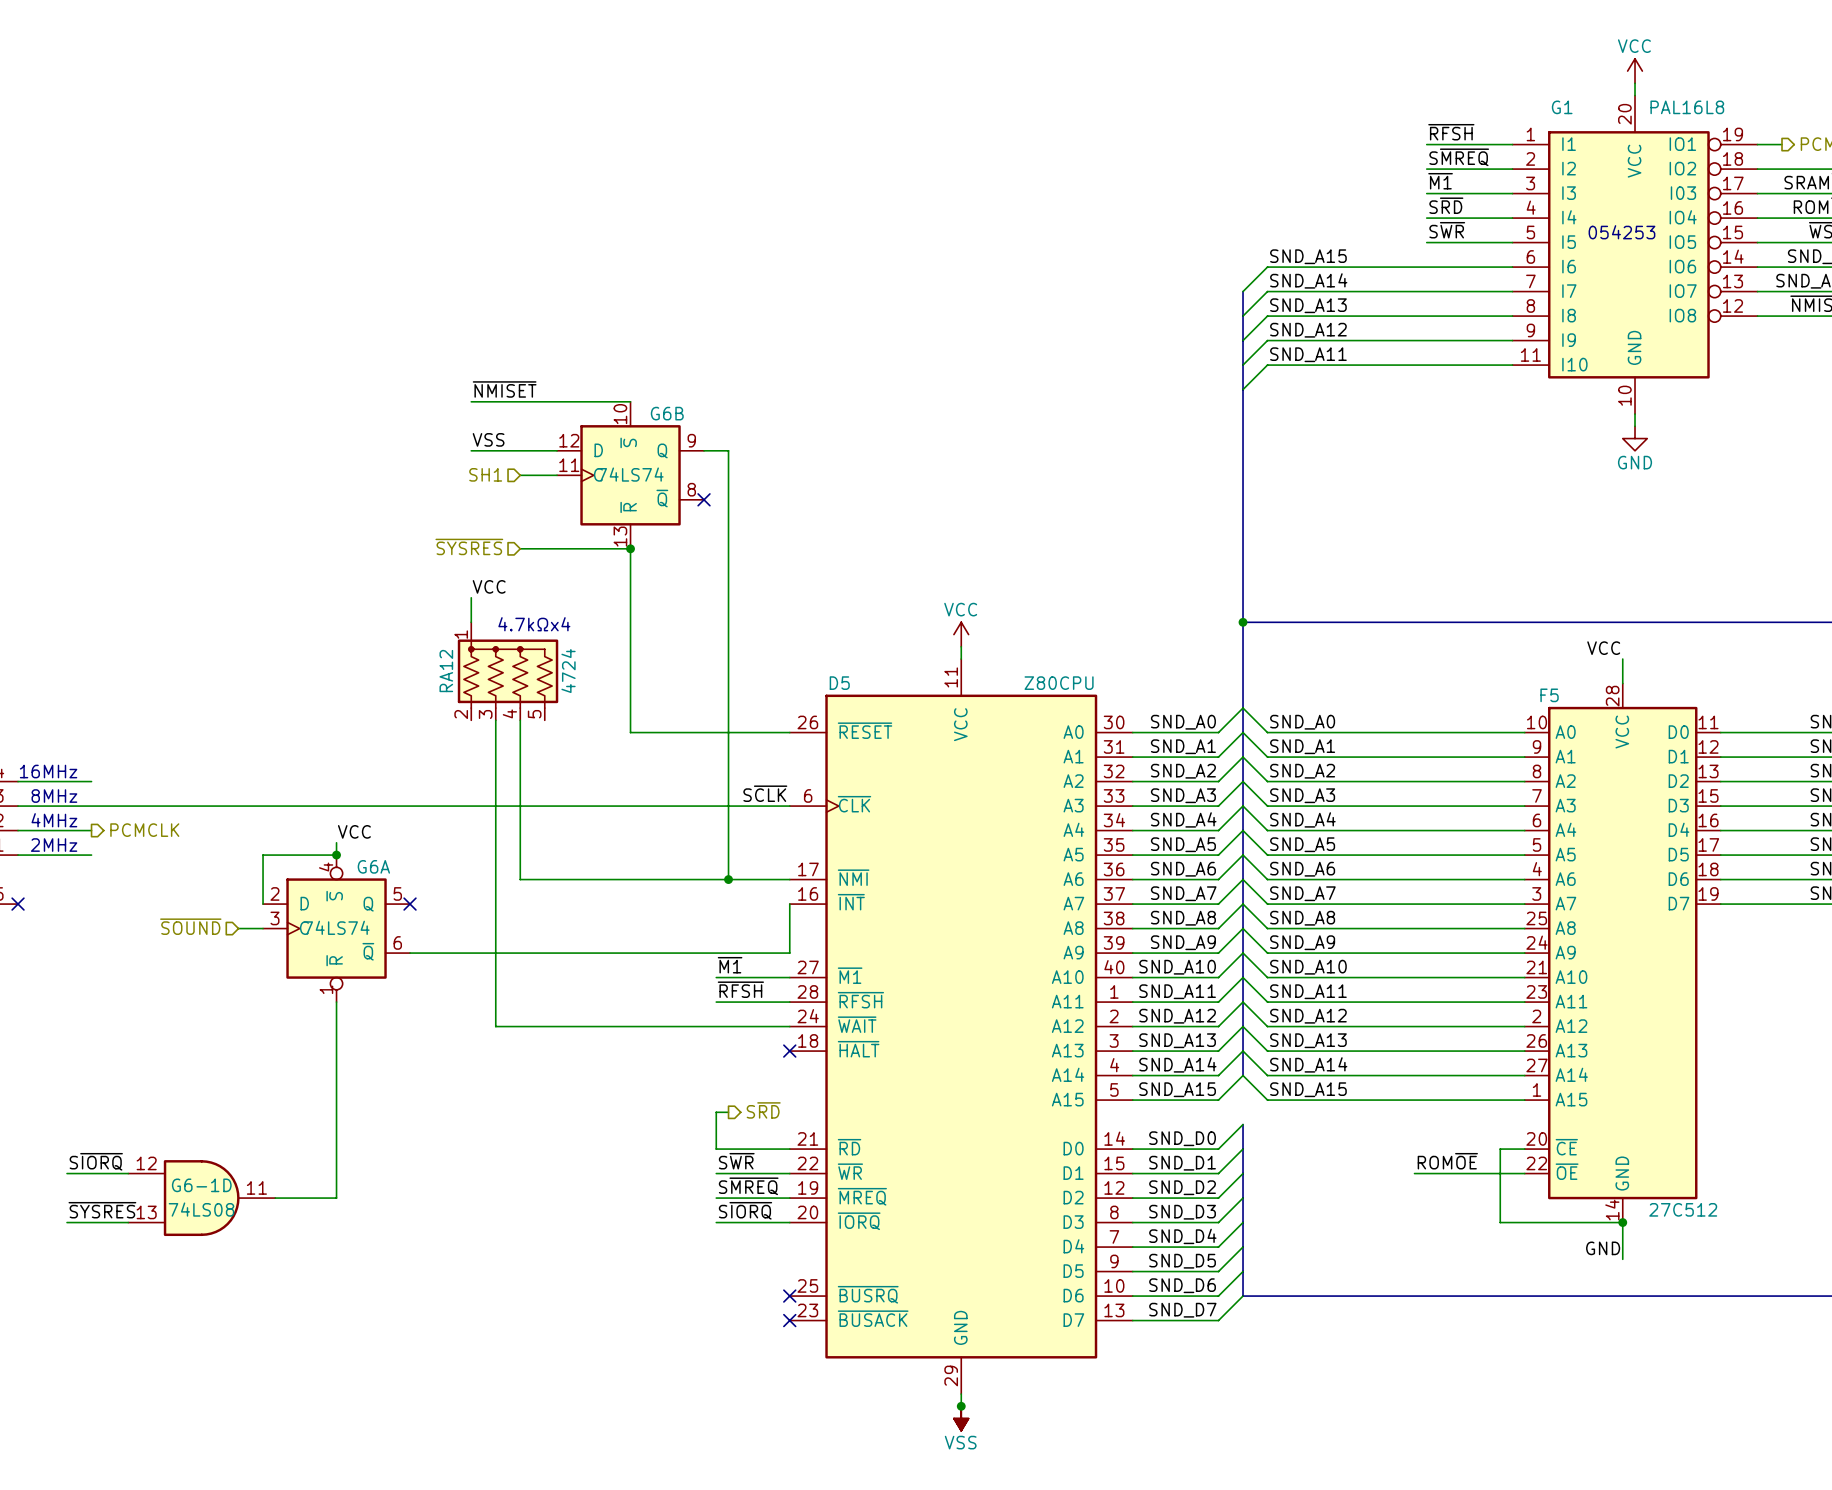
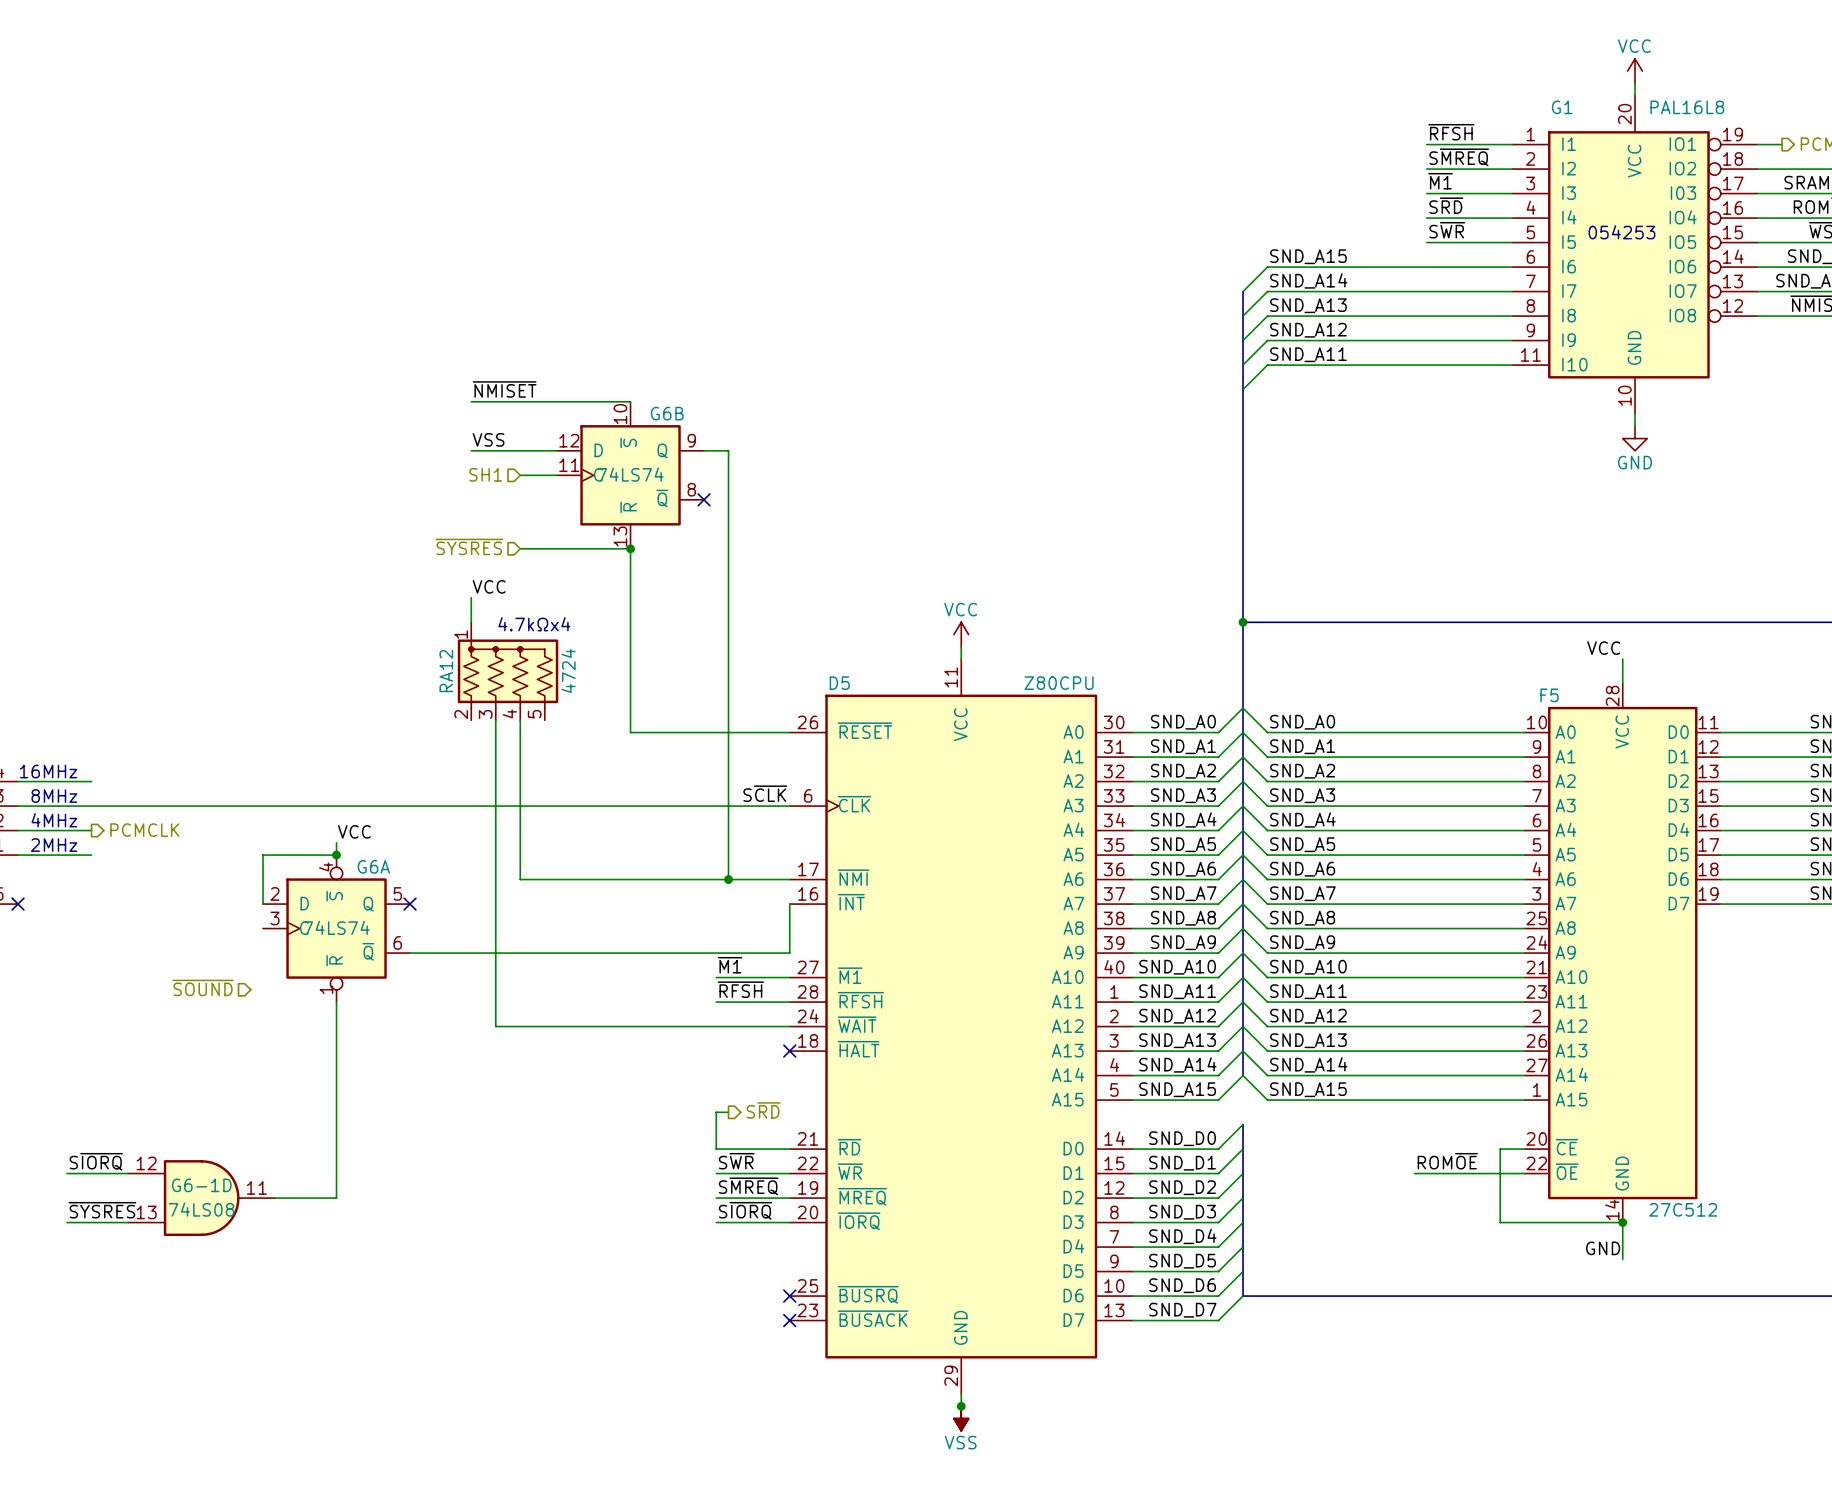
hierarchical label position: ~{SOUND} (190, 926) -> ~{SOUND} (203, 987)
wire: (238, 928) (263, 928) -> none

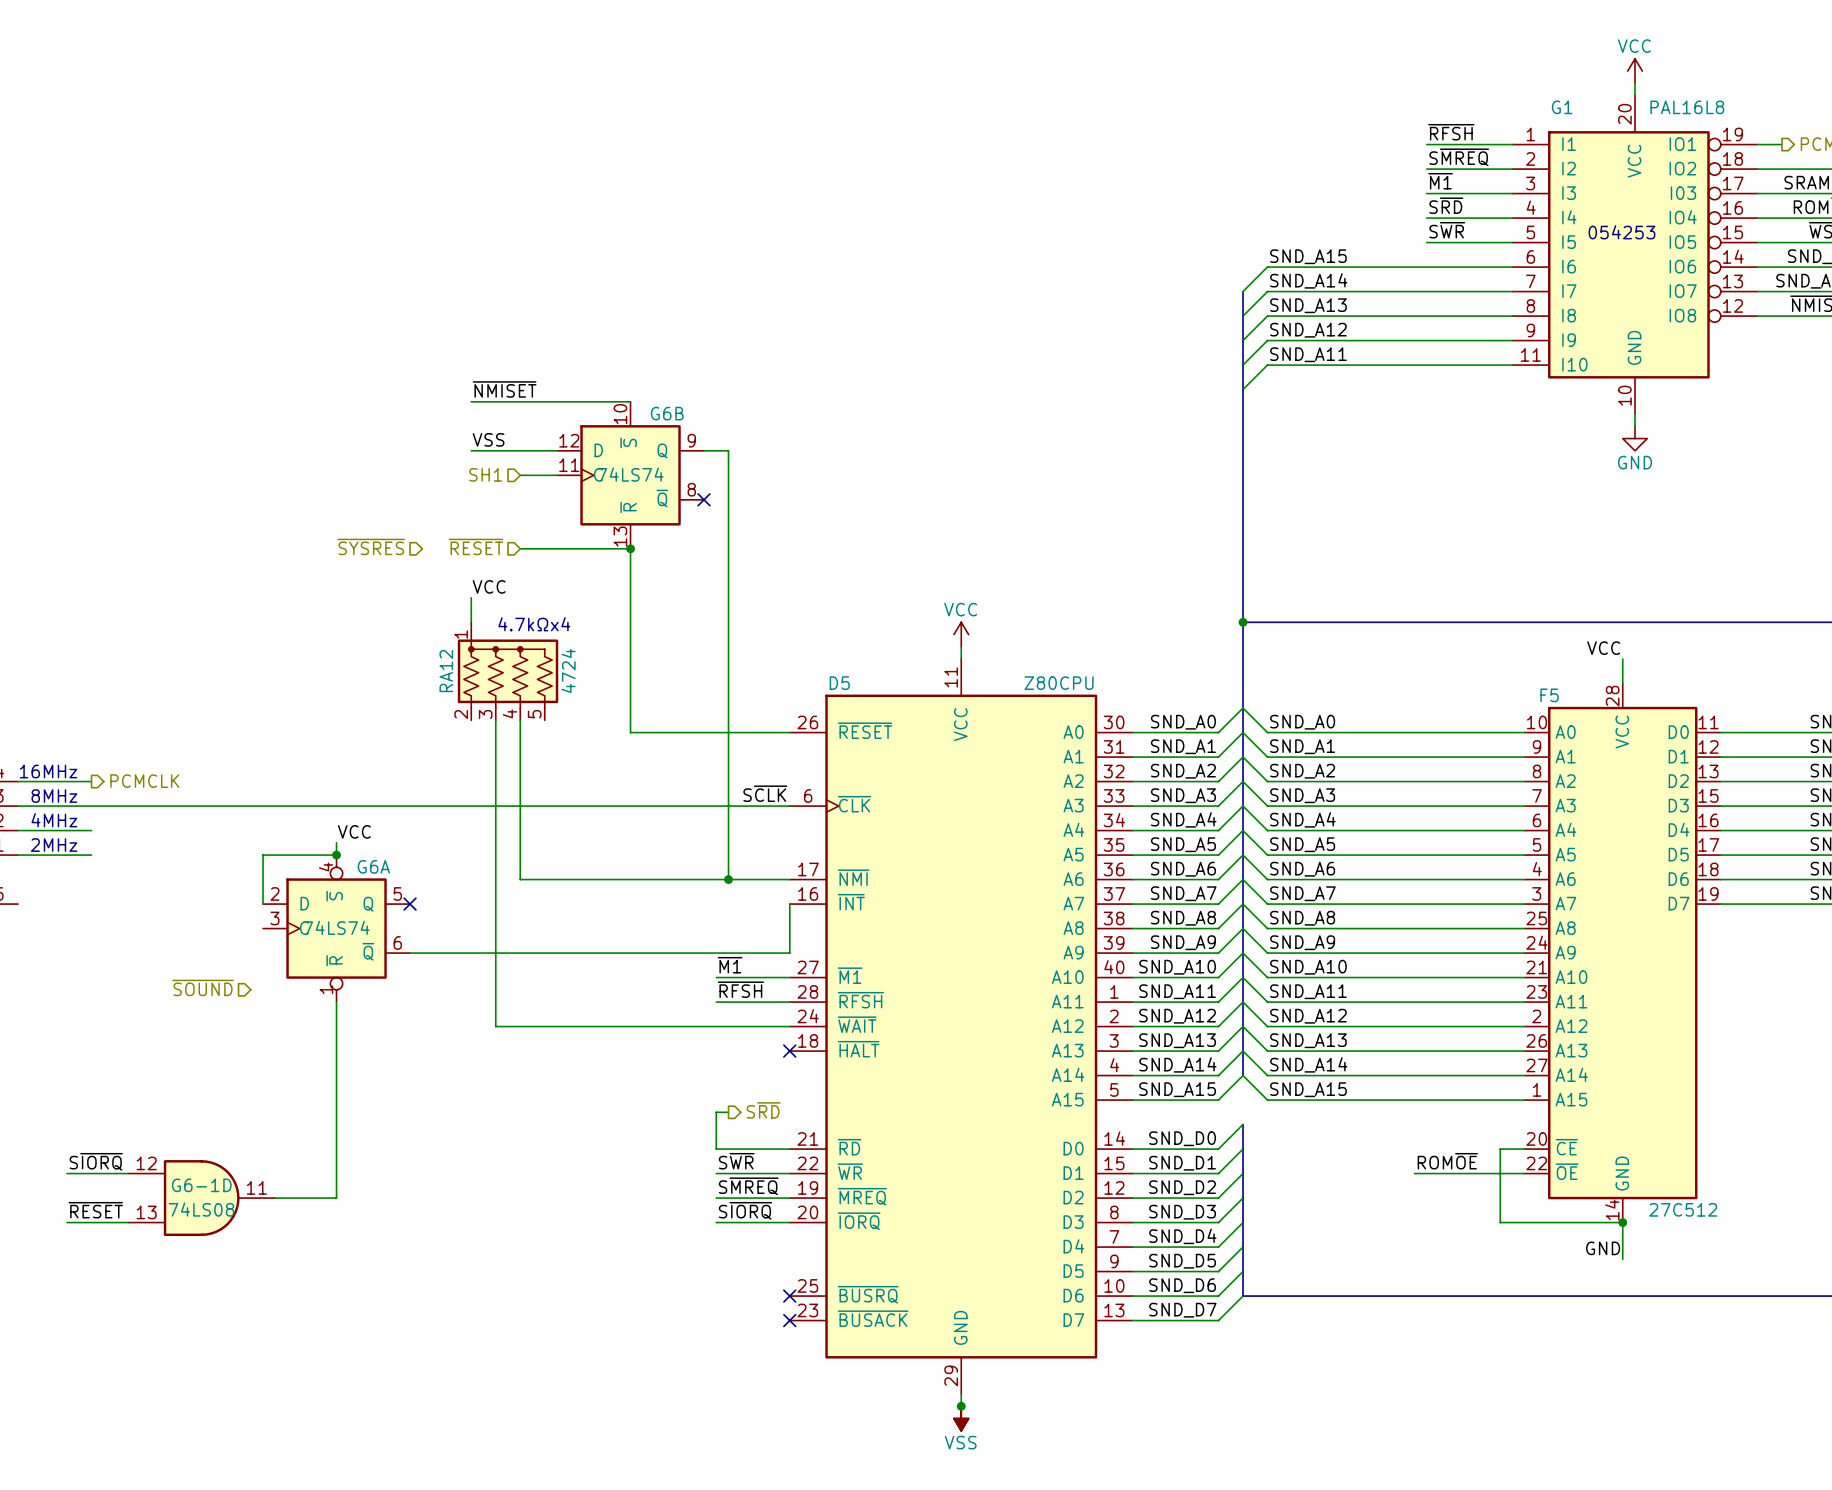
hierarchical label: none -> ~{SYSRES} (371, 546)
hierarchical label: ~{SYSRES} (469, 546) -> ~{RESET} (476, 546)
hierarchical label position: PCMCLK (144, 830) -> PCMCLK (144, 781)
no-connect mark: (18, 904) -> none
label: ~{SYSRES} (102, 1210) -> ~{RESET} (95, 1210)

